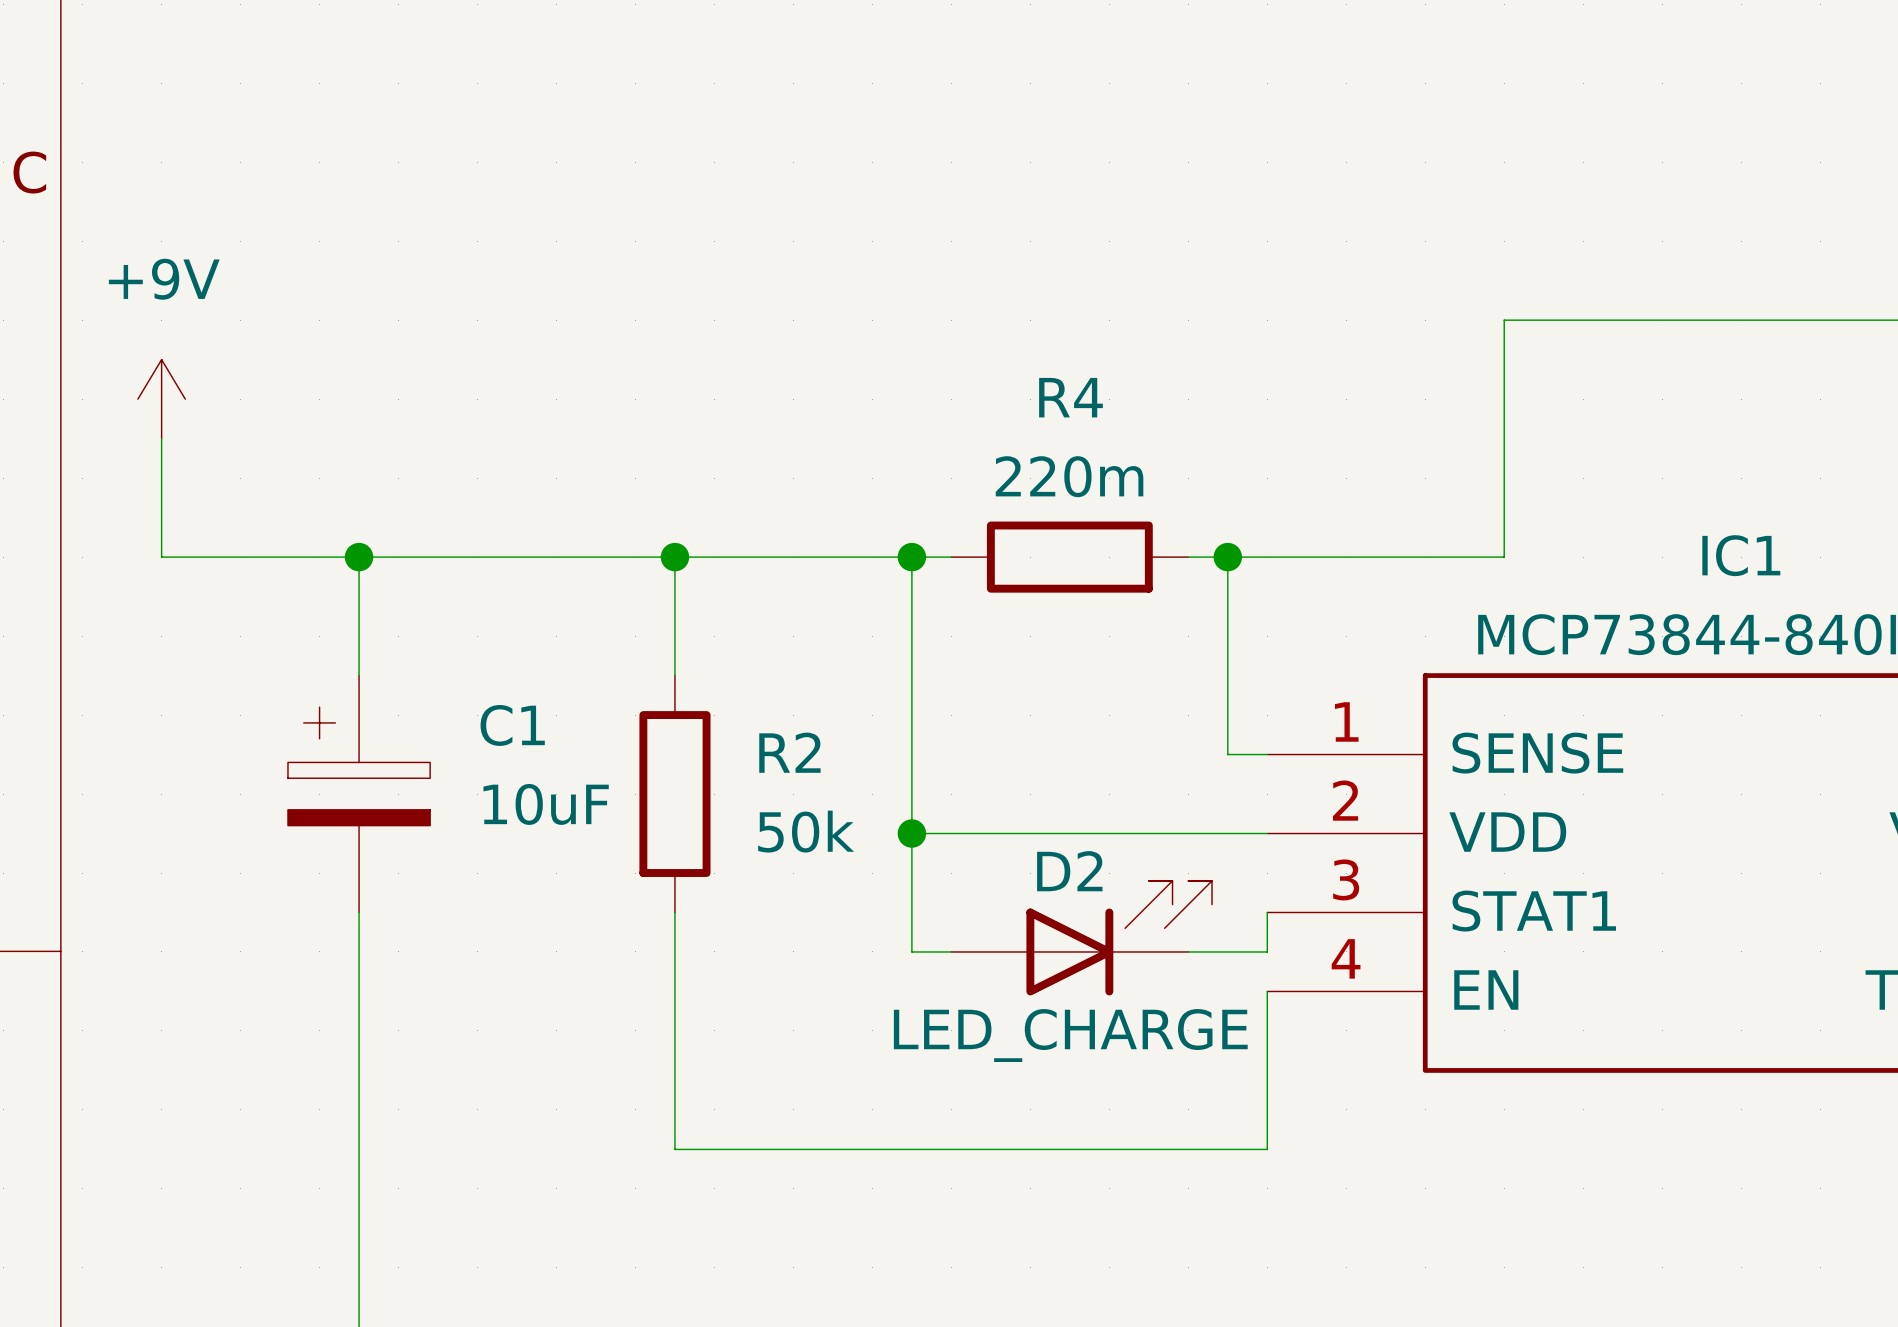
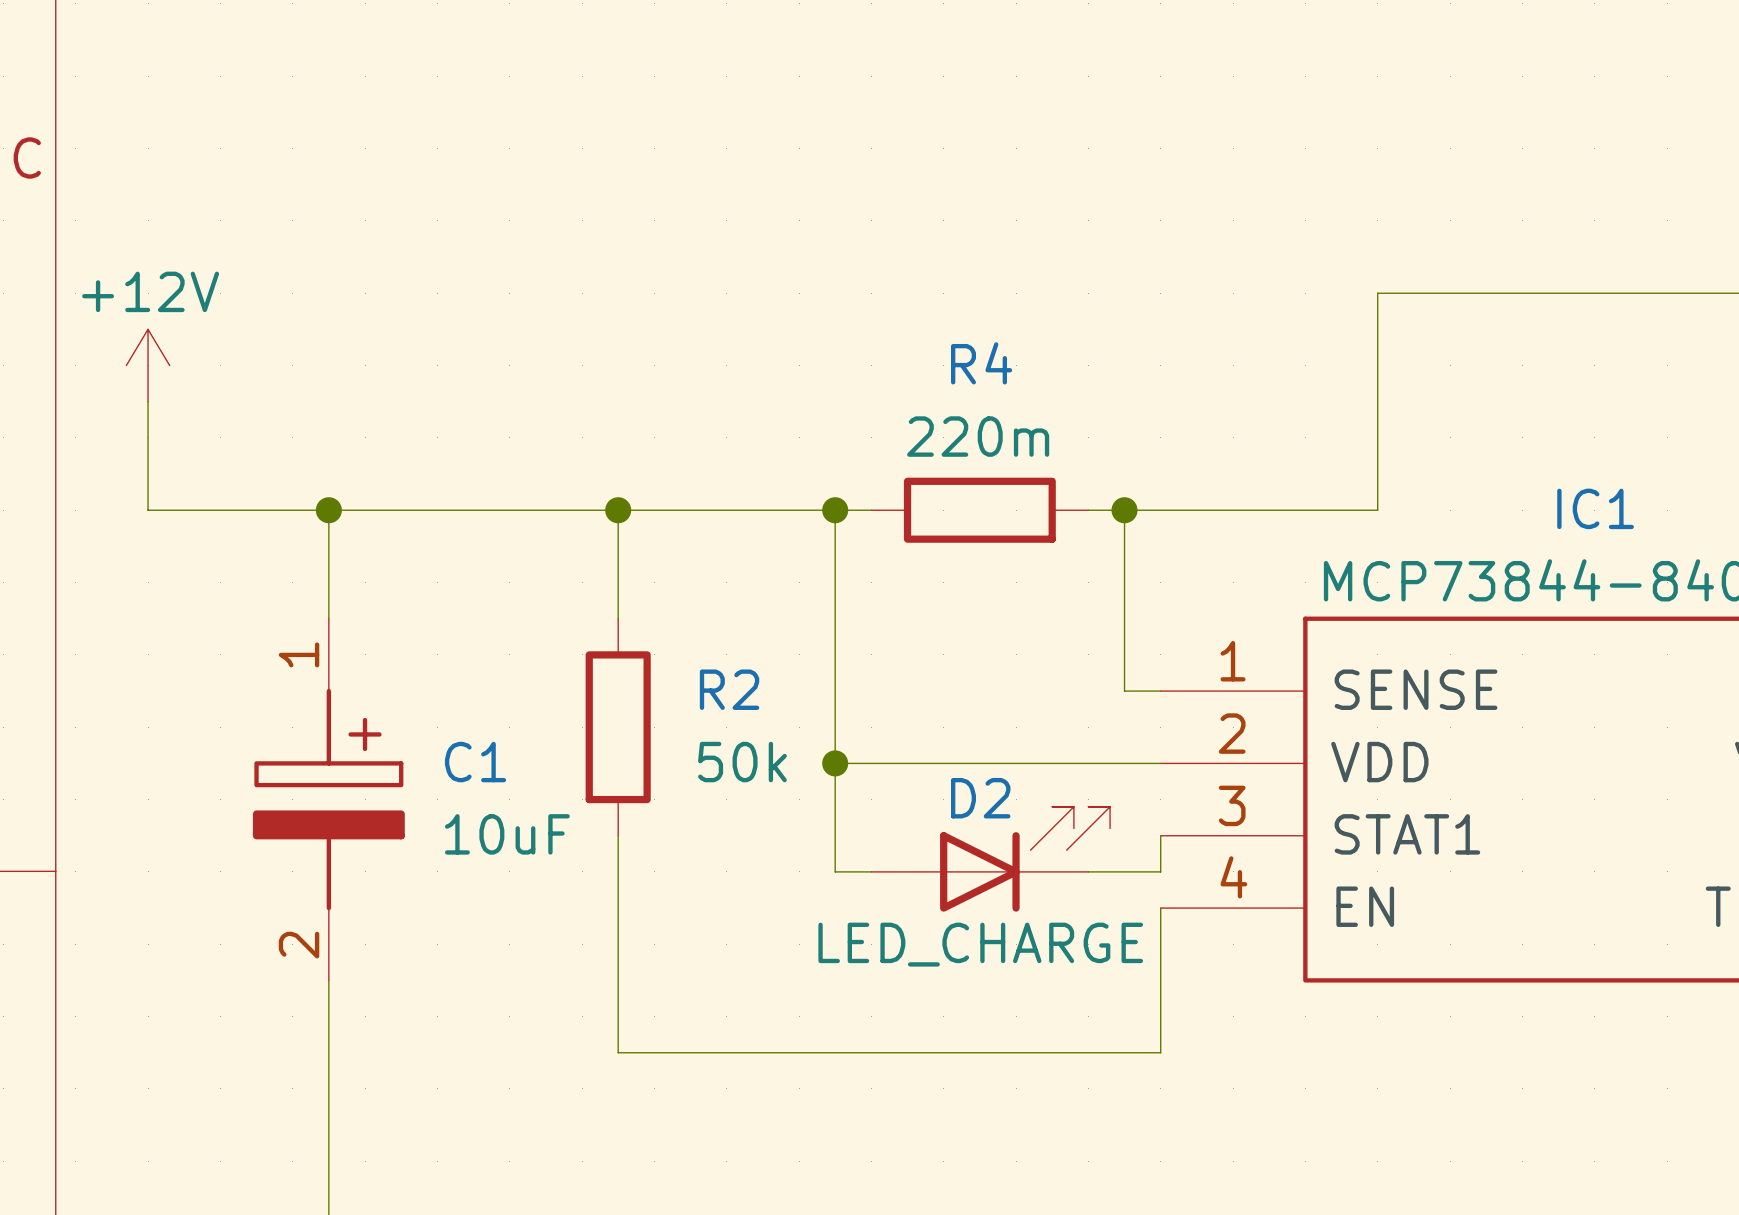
power symbol: +9V (161, 399) -> +12V (148, 365)
C1 symbol: [287, 675, 431, 913] -> [252, 618, 405, 981]

